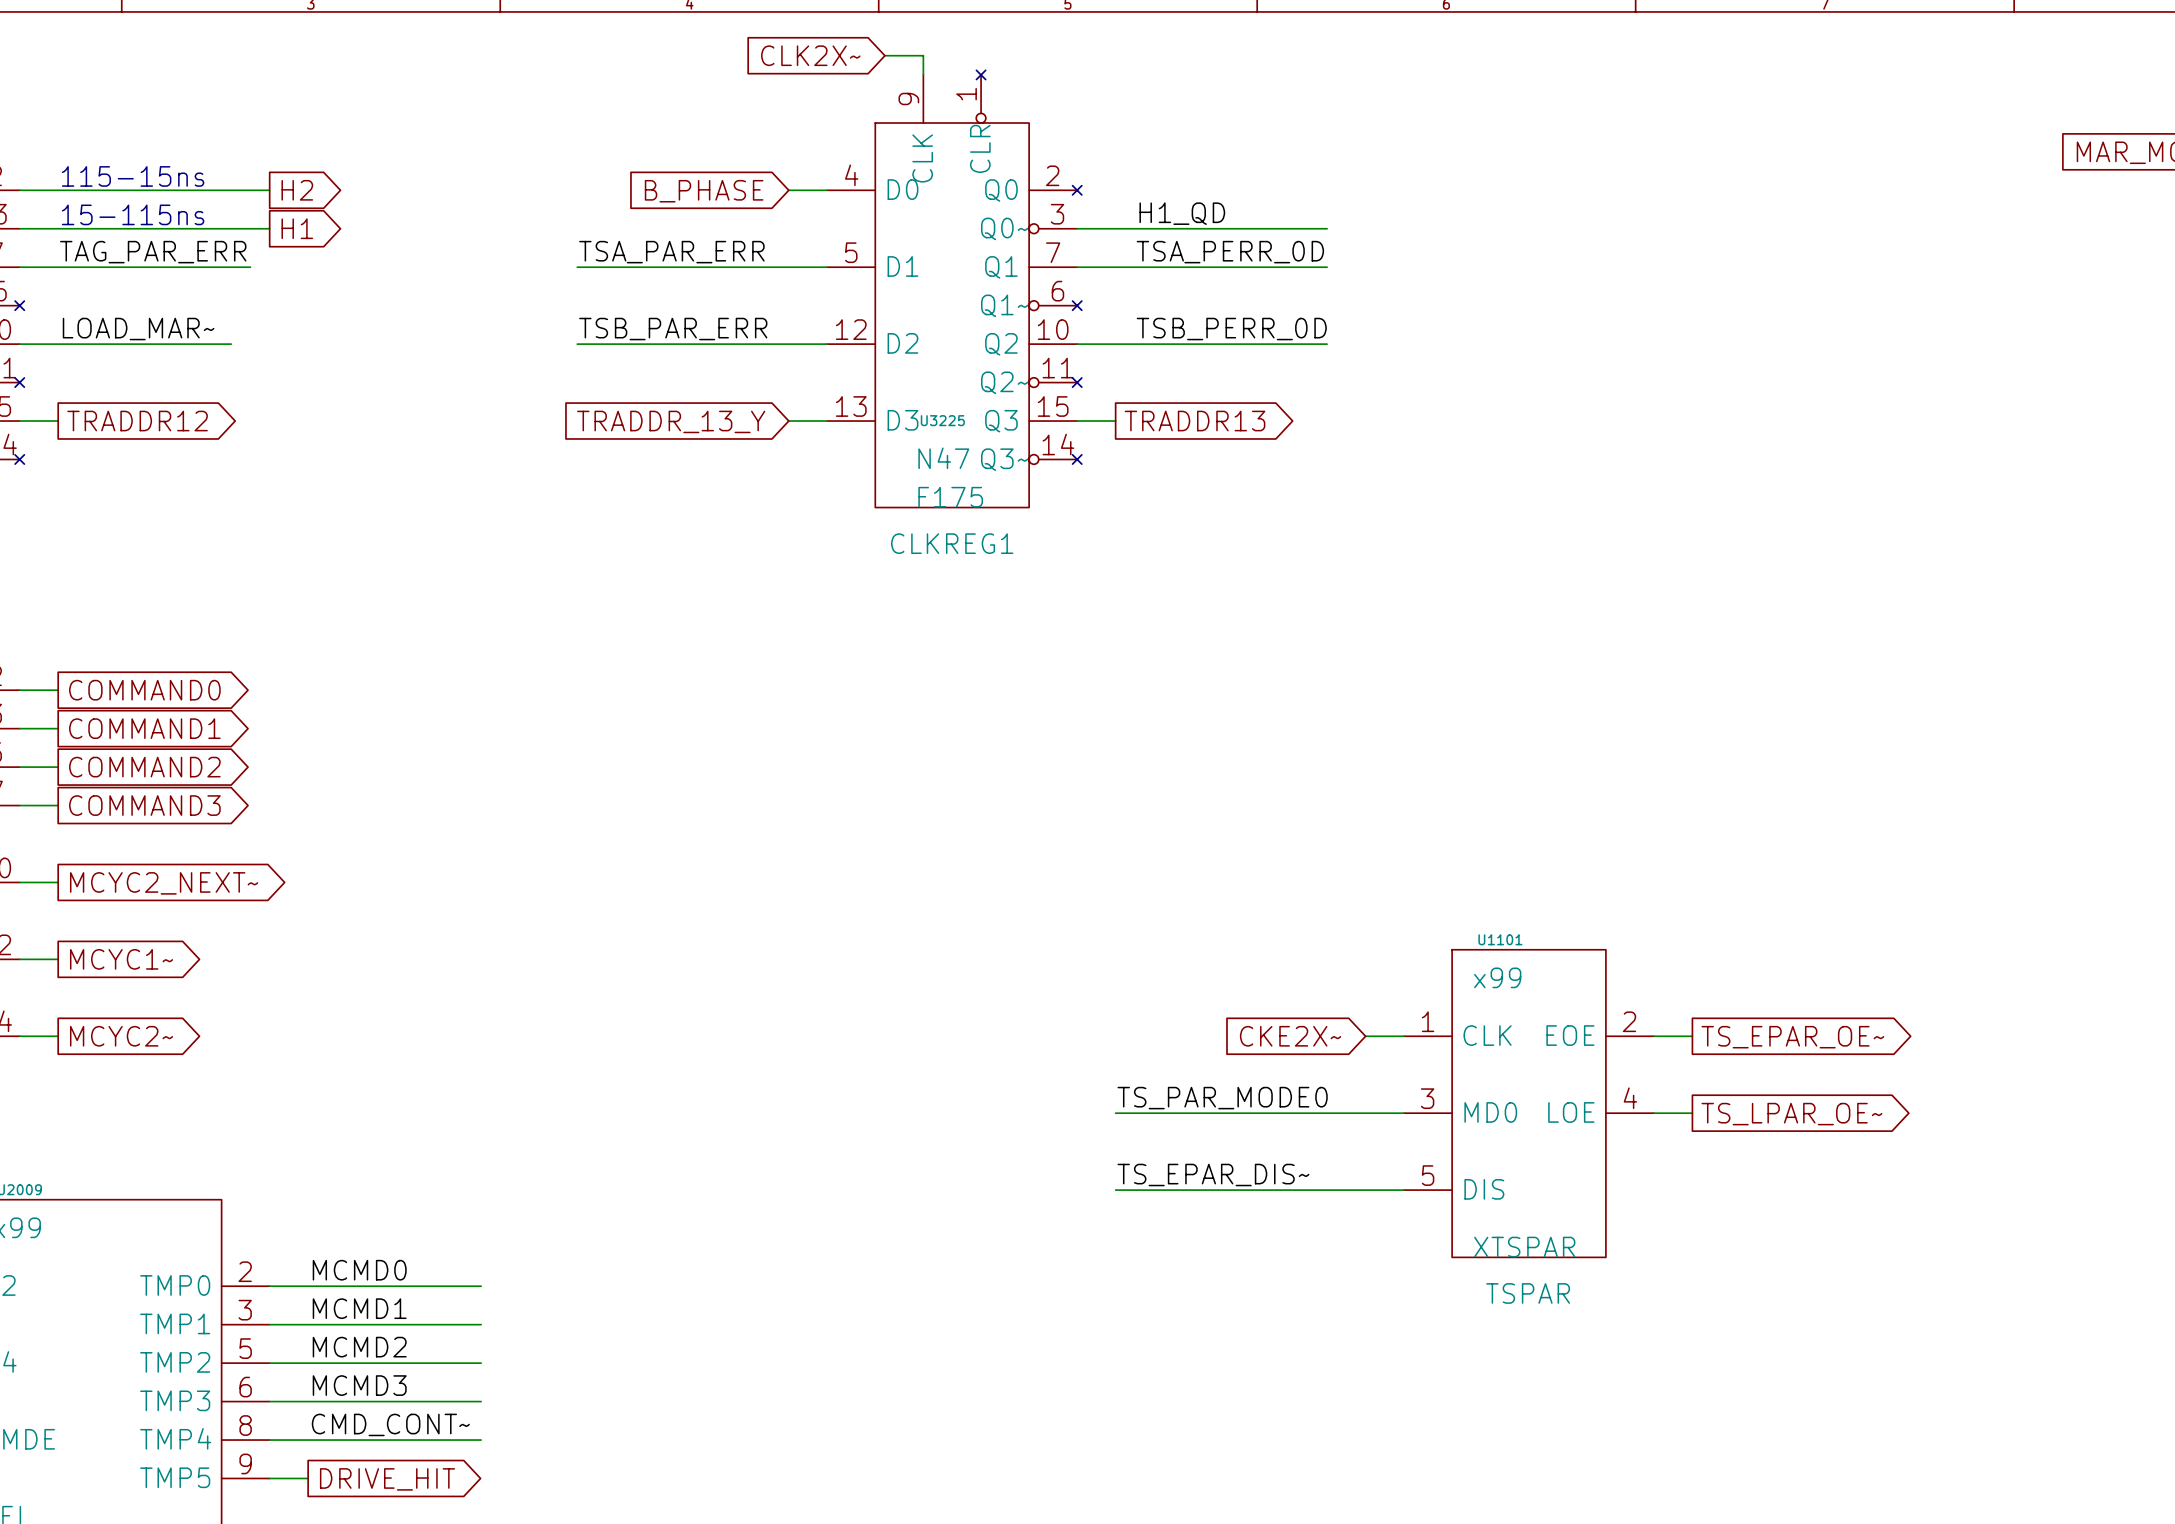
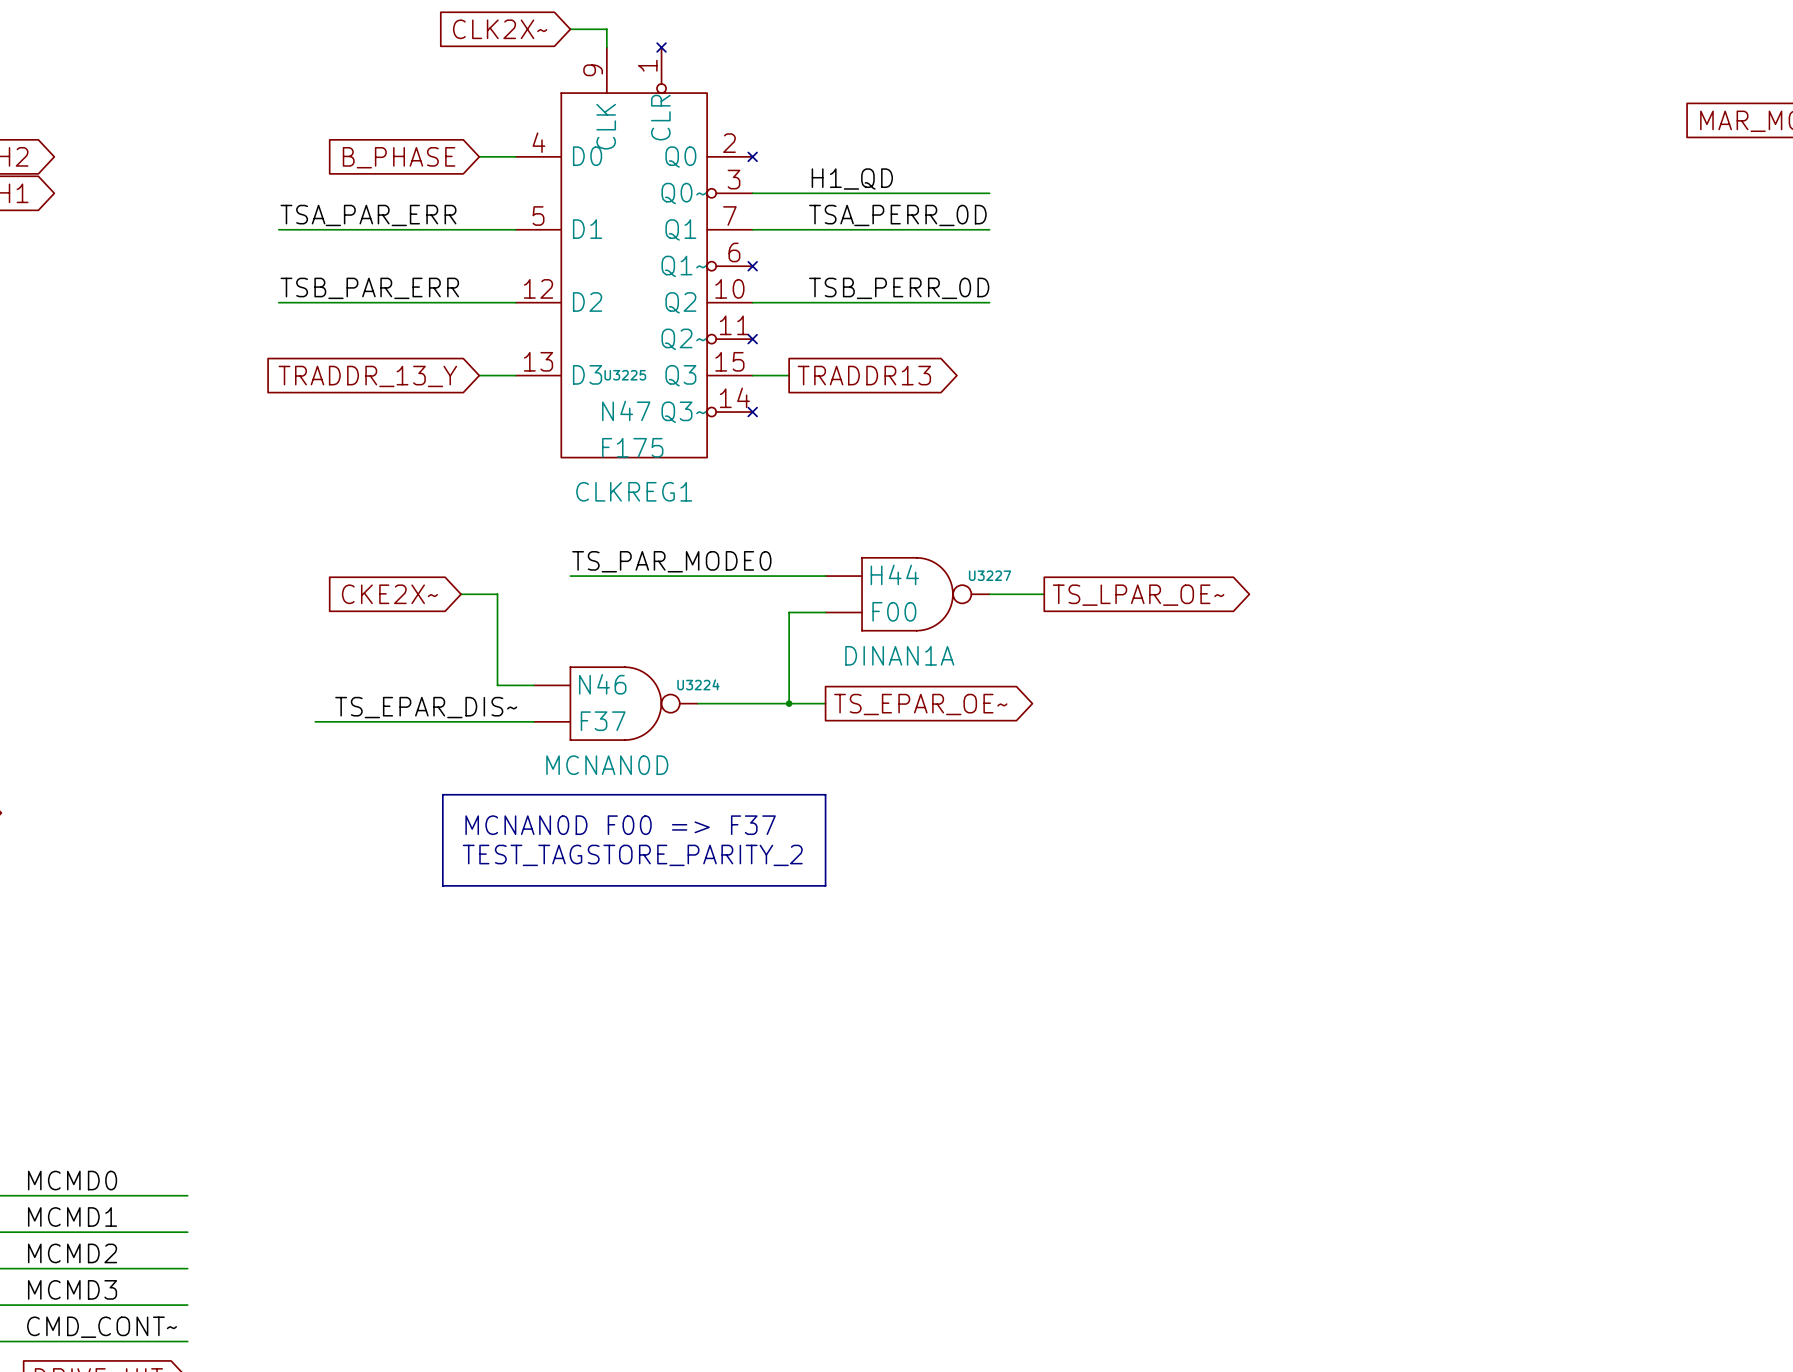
label: none -> TS_PAR_MODE0 (671, 561)
wire: none -> (570, 576) (825, 576)
global label: none -> CKE2X~ (389, 594)
wire: none -> (461, 594) (497, 594) (497, 685) (533, 685)
U3227: none -> F00 (907, 594)
wire: none -> (989, 594) (1044, 594)
global label: none -> TS_LPAR_OE~ (1138, 595)
wire: none -> (825, 612) (789, 612) (789, 703)
U3224: none -> F37 (615, 703)
wire: none -> (697, 703) (825, 703)
junction: none -> (789, 703)
global label: none -> TS_EPAR_OE~ (920, 704)
label: none -> TS_EPAR_DIS~ (426, 707)
wire: none -> (315, 721) (533, 721)
line: none -> (442, 794) (825, 794) (825, 885) (442, 885) (442, 794)
text: none -> MCNAN0D F00 => F37 (620, 825)
text: none -> TEST_TAGSTORE_PARITY_2 (632, 855)
global label: CKE2X~ (1290, 1036) -> none
wire: (1365, 1036) (1404, 1036) -> none
wire: (1653, 1036) (1692, 1036) -> none
global label: TS_EPAR_OE~ (1792, 1037) -> none
label: TS_PAR_MODE0 (1222, 1098) -> none
U1101: XTSPAR (1529, 1103) -> none
wire: (1115, 1113) (1404, 1113) -> none
wire: (1653, 1113) (1692, 1113) -> none
global label: TS_LPAR_OE~ (1791, 1114) -> none
label: TS_EPAR_DIS~ (1213, 1174) -> none
wire: (1115, 1190) (1404, 1190) -> none

